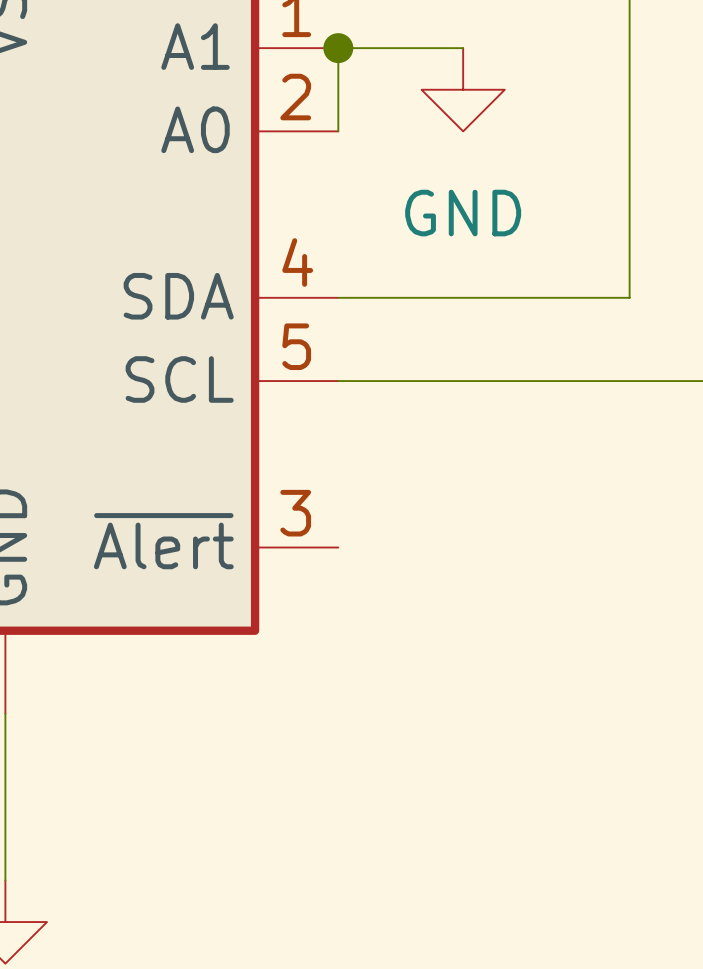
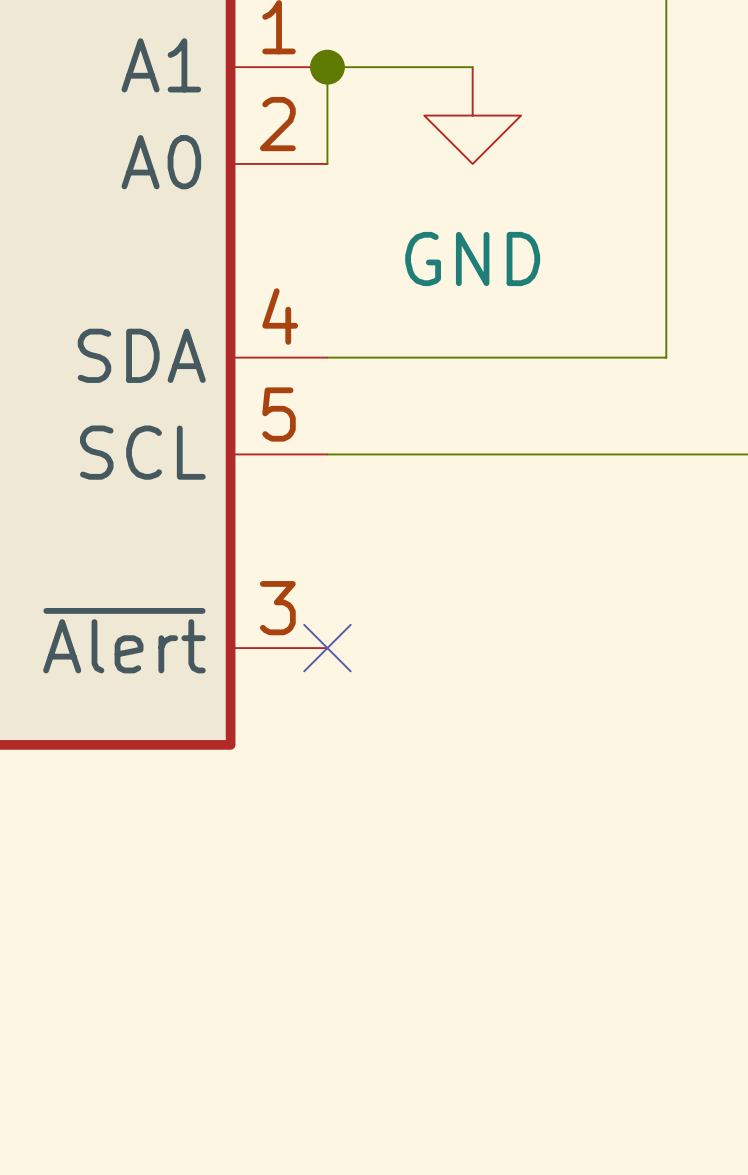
no-connect mark: none -> (327, 648)

